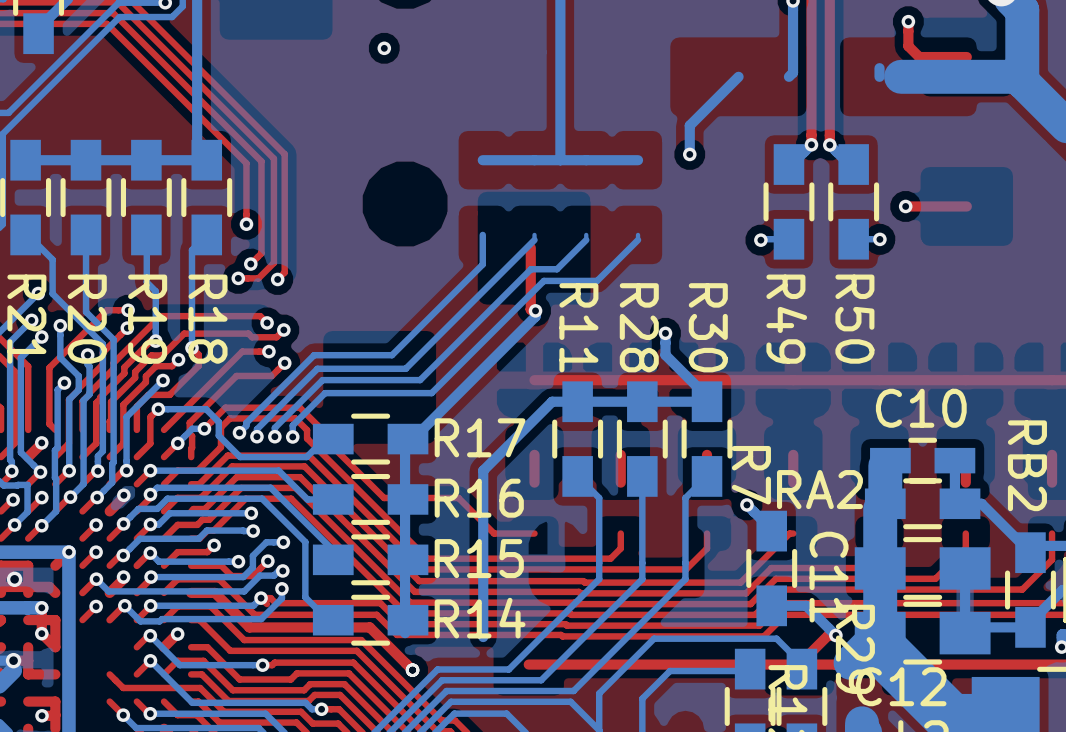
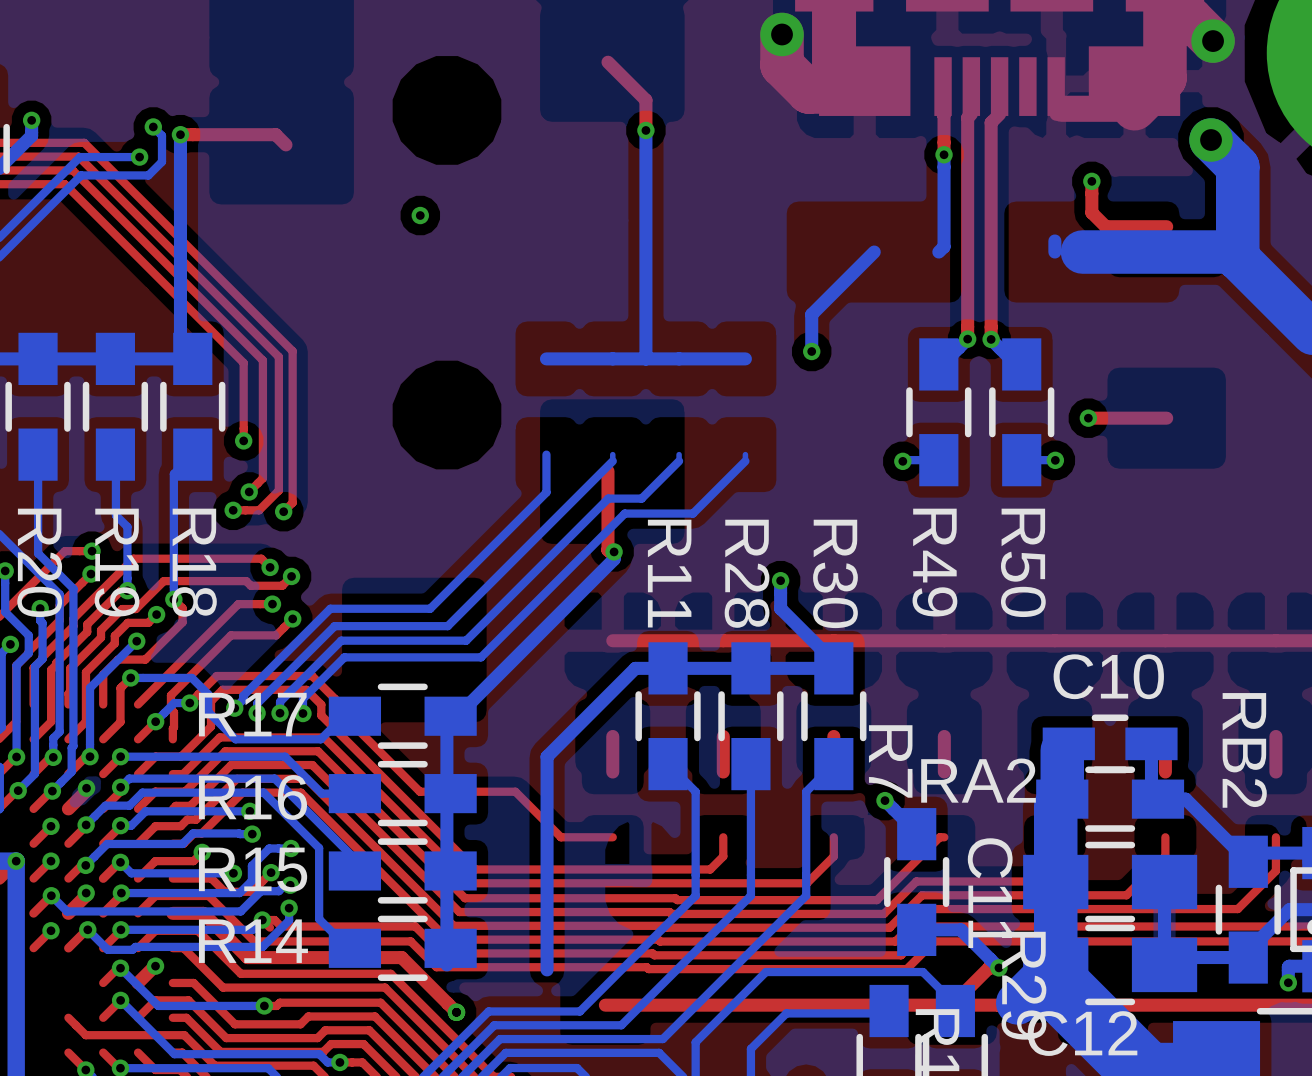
R17 name position: R17 (480, 437) -> R17 (252, 714)
R16 name position: R16 (479, 498) -> R16 (252, 797)
R15 name position: R15 (479, 558) -> R15 (253, 869)
R14 name position: R14 (480, 618) -> R14 (253, 941)

